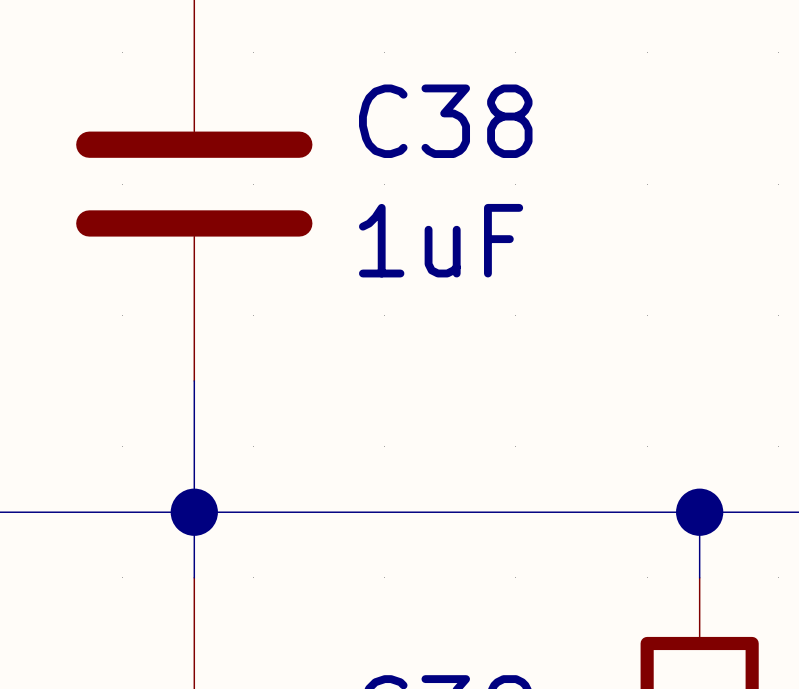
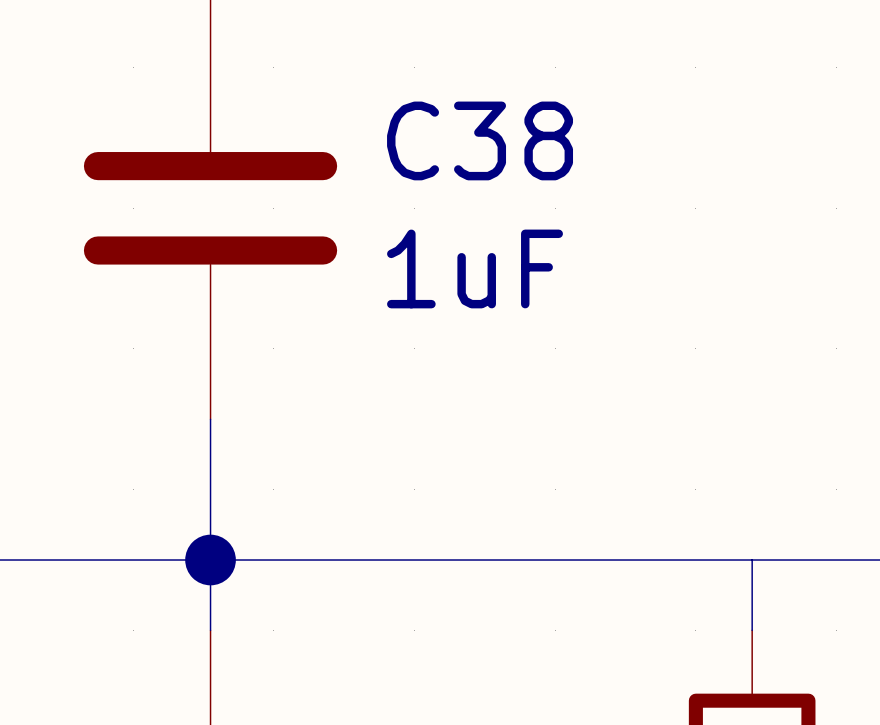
junction: (699, 512) -> none

